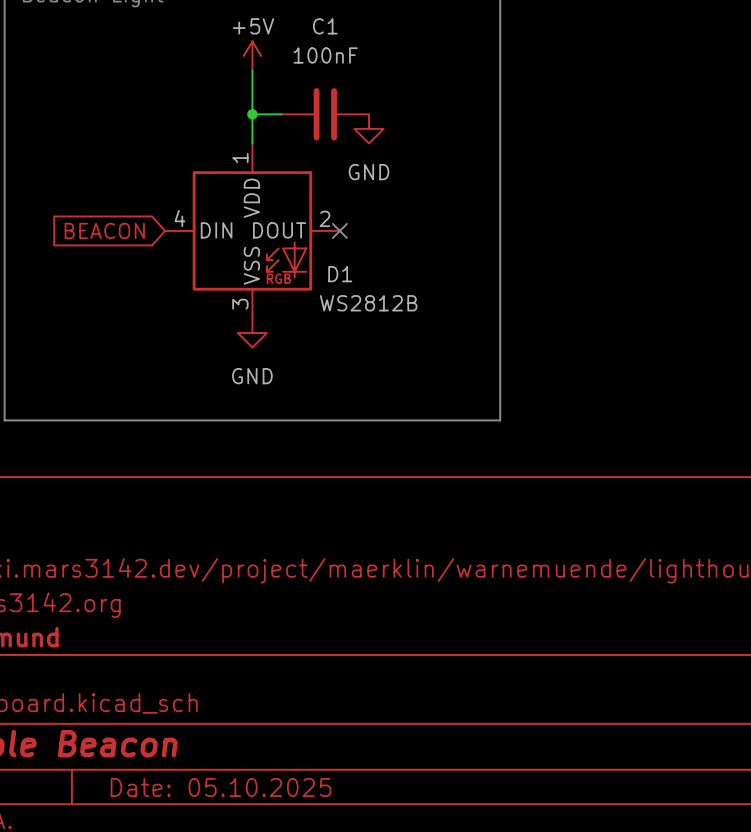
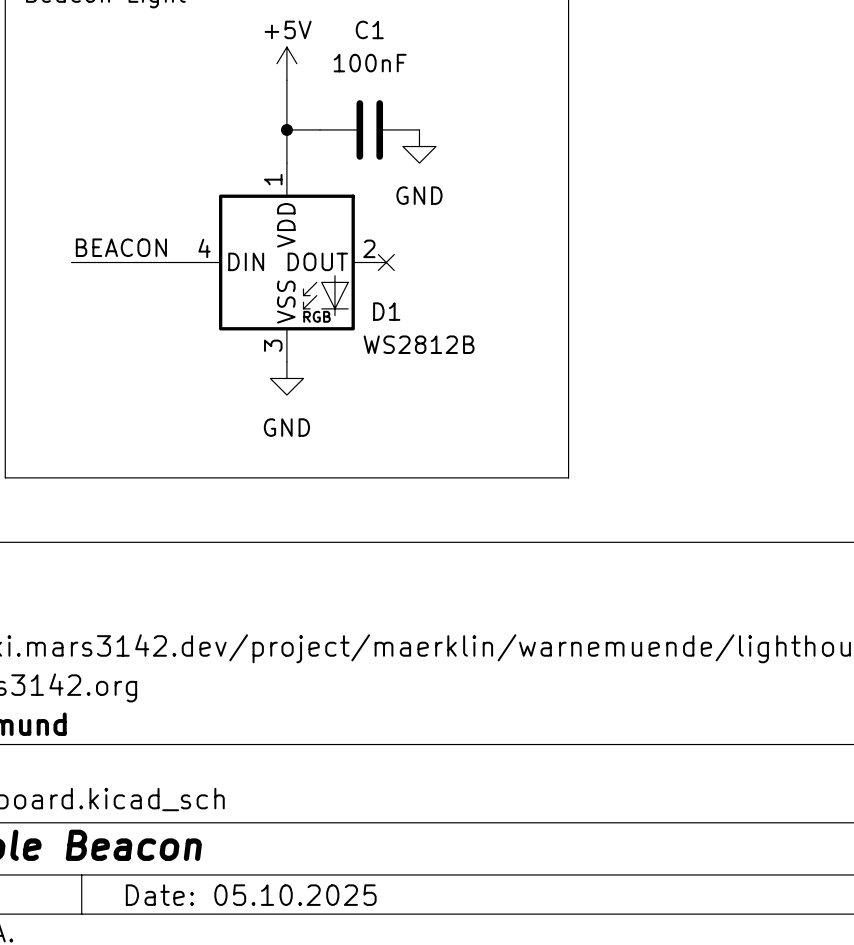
label: none -> BEACON (121, 247)
wire: none -> (71, 262) (187, 262)
global label: BEACON (104, 230) -> none

